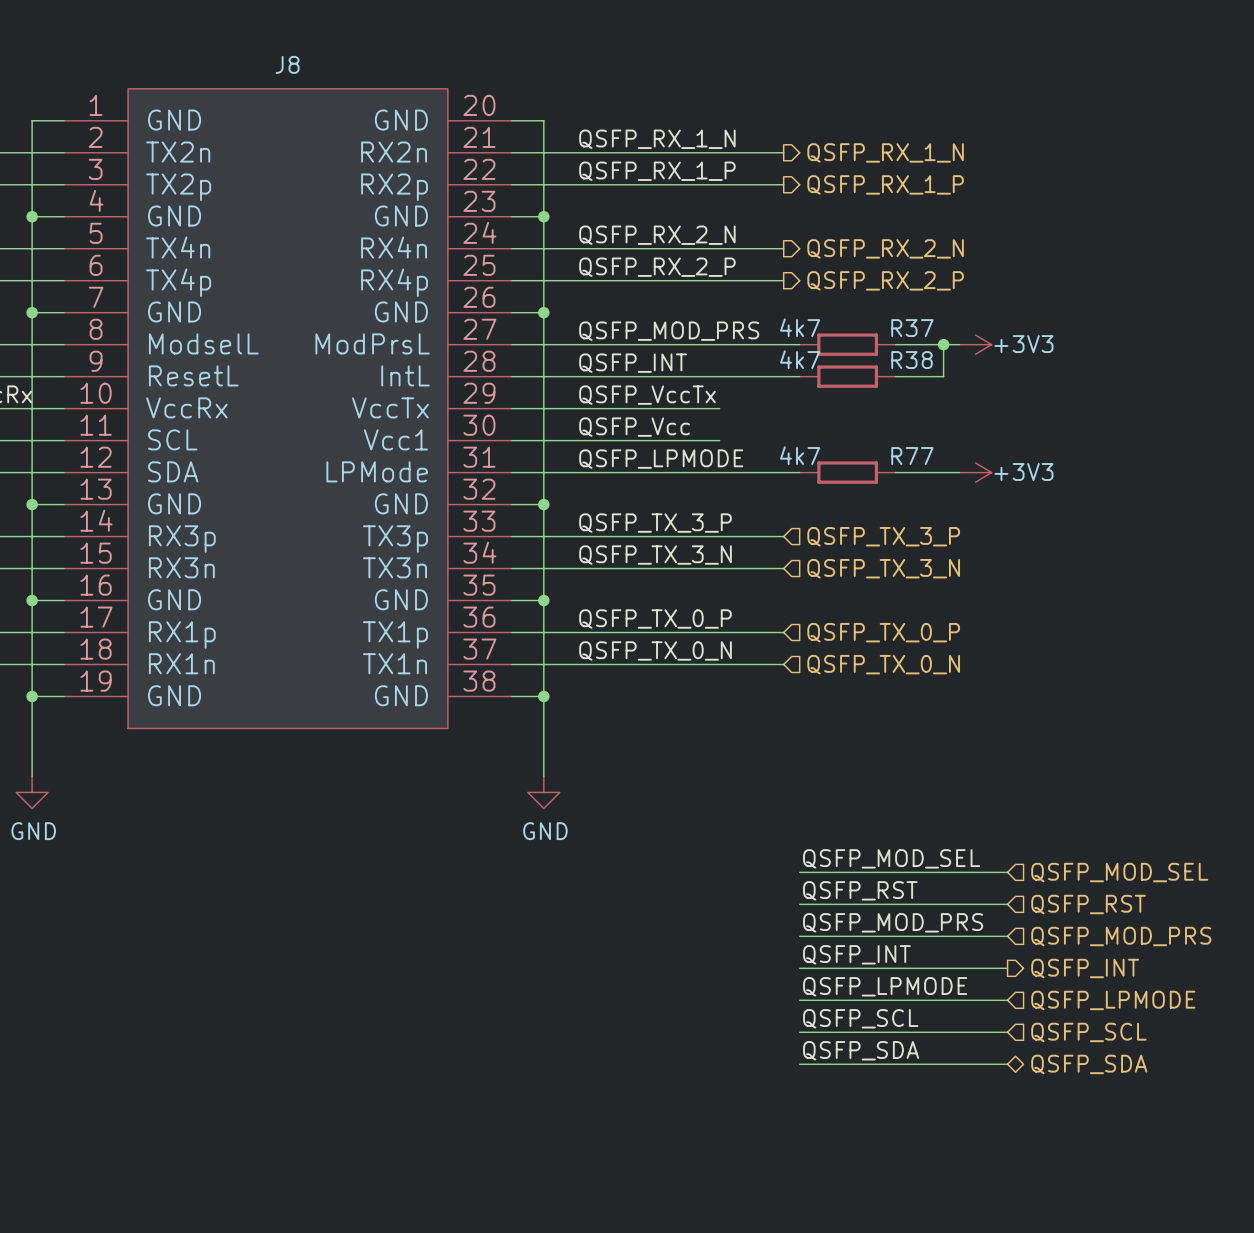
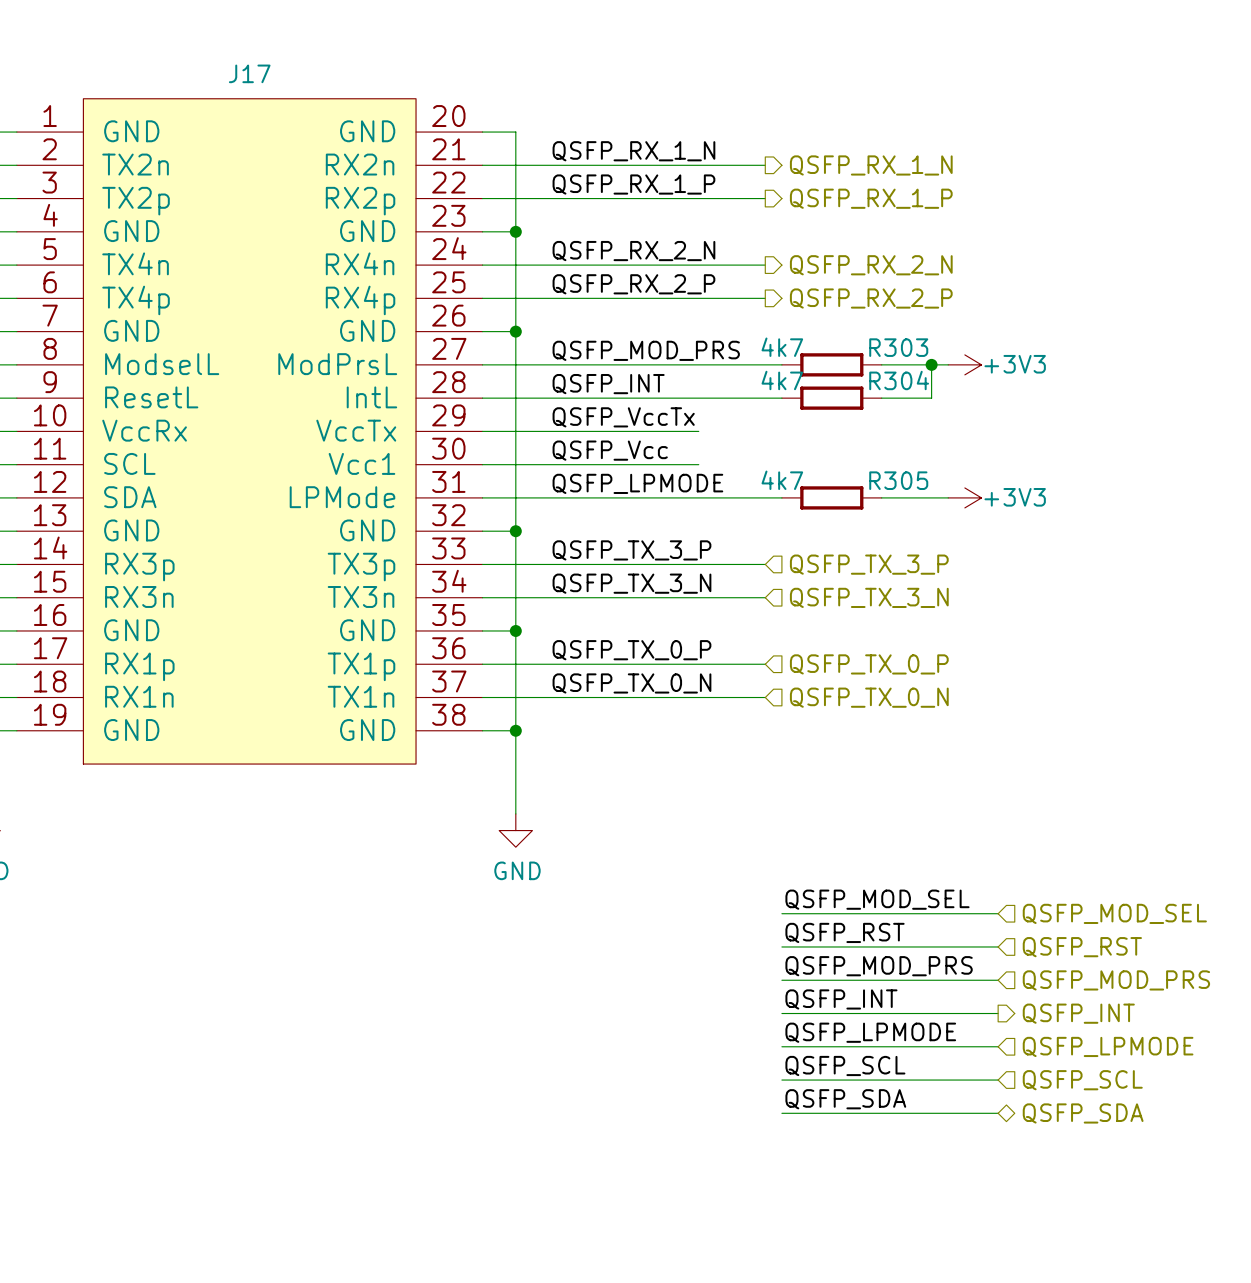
J8 name: J8 (287, 64) -> J17 (249, 73)
R37 name: R37 (912, 328) -> R303 (898, 347)
R38 name: R38 (912, 360) -> R304 (899, 380)
R77 name: R77 (912, 456) -> R305 (898, 480)

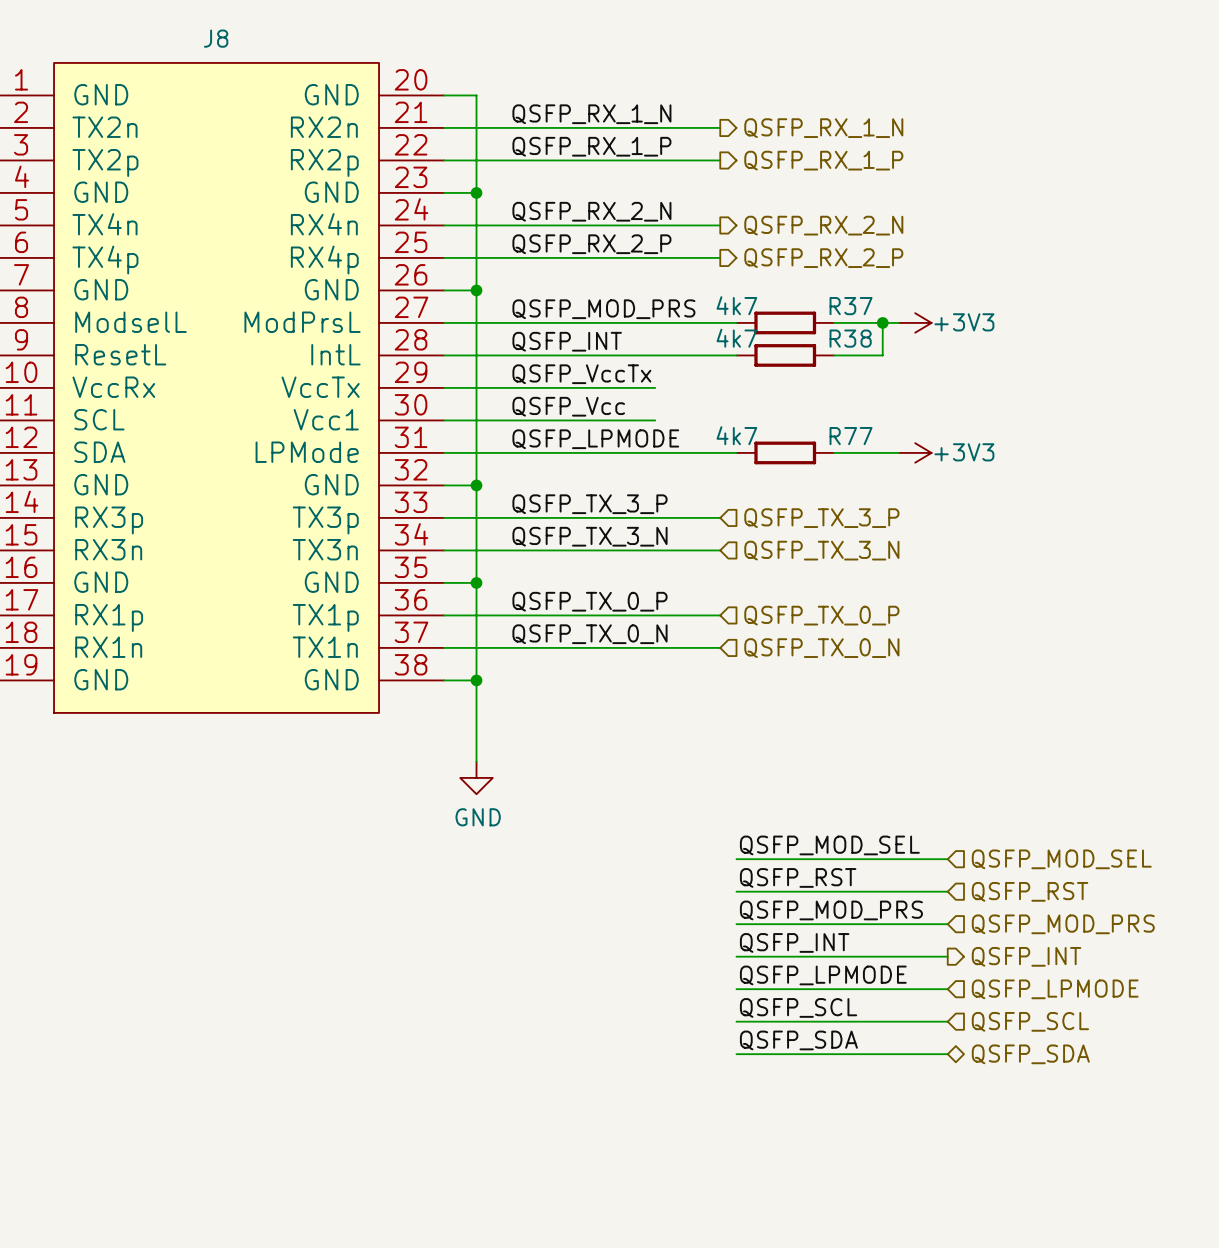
J17 name: J17 (249, 73) -> J8 (216, 38)
R303 name: R303 (898, 347) -> R37 (851, 306)
R304 name: R304 (899, 380) -> R38 (850, 338)
R305 name: R305 (898, 480) -> R77 (851, 436)

